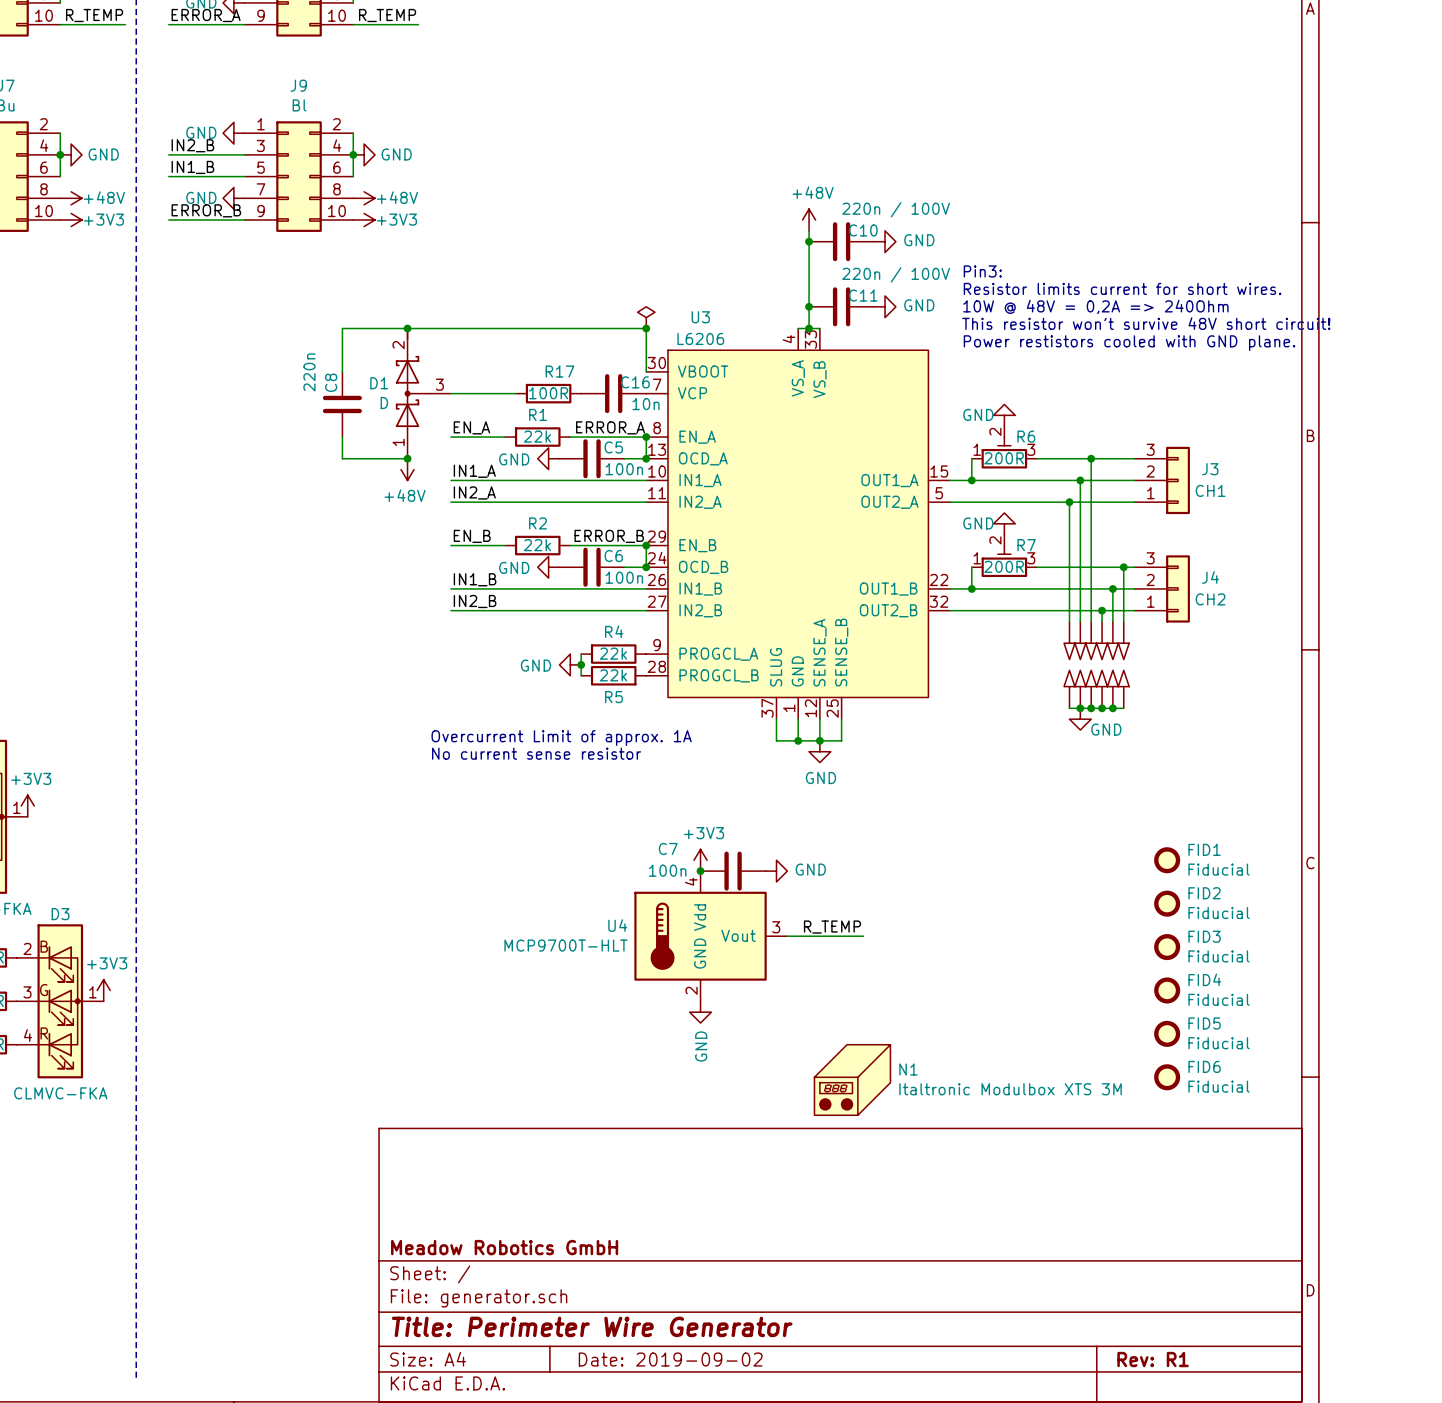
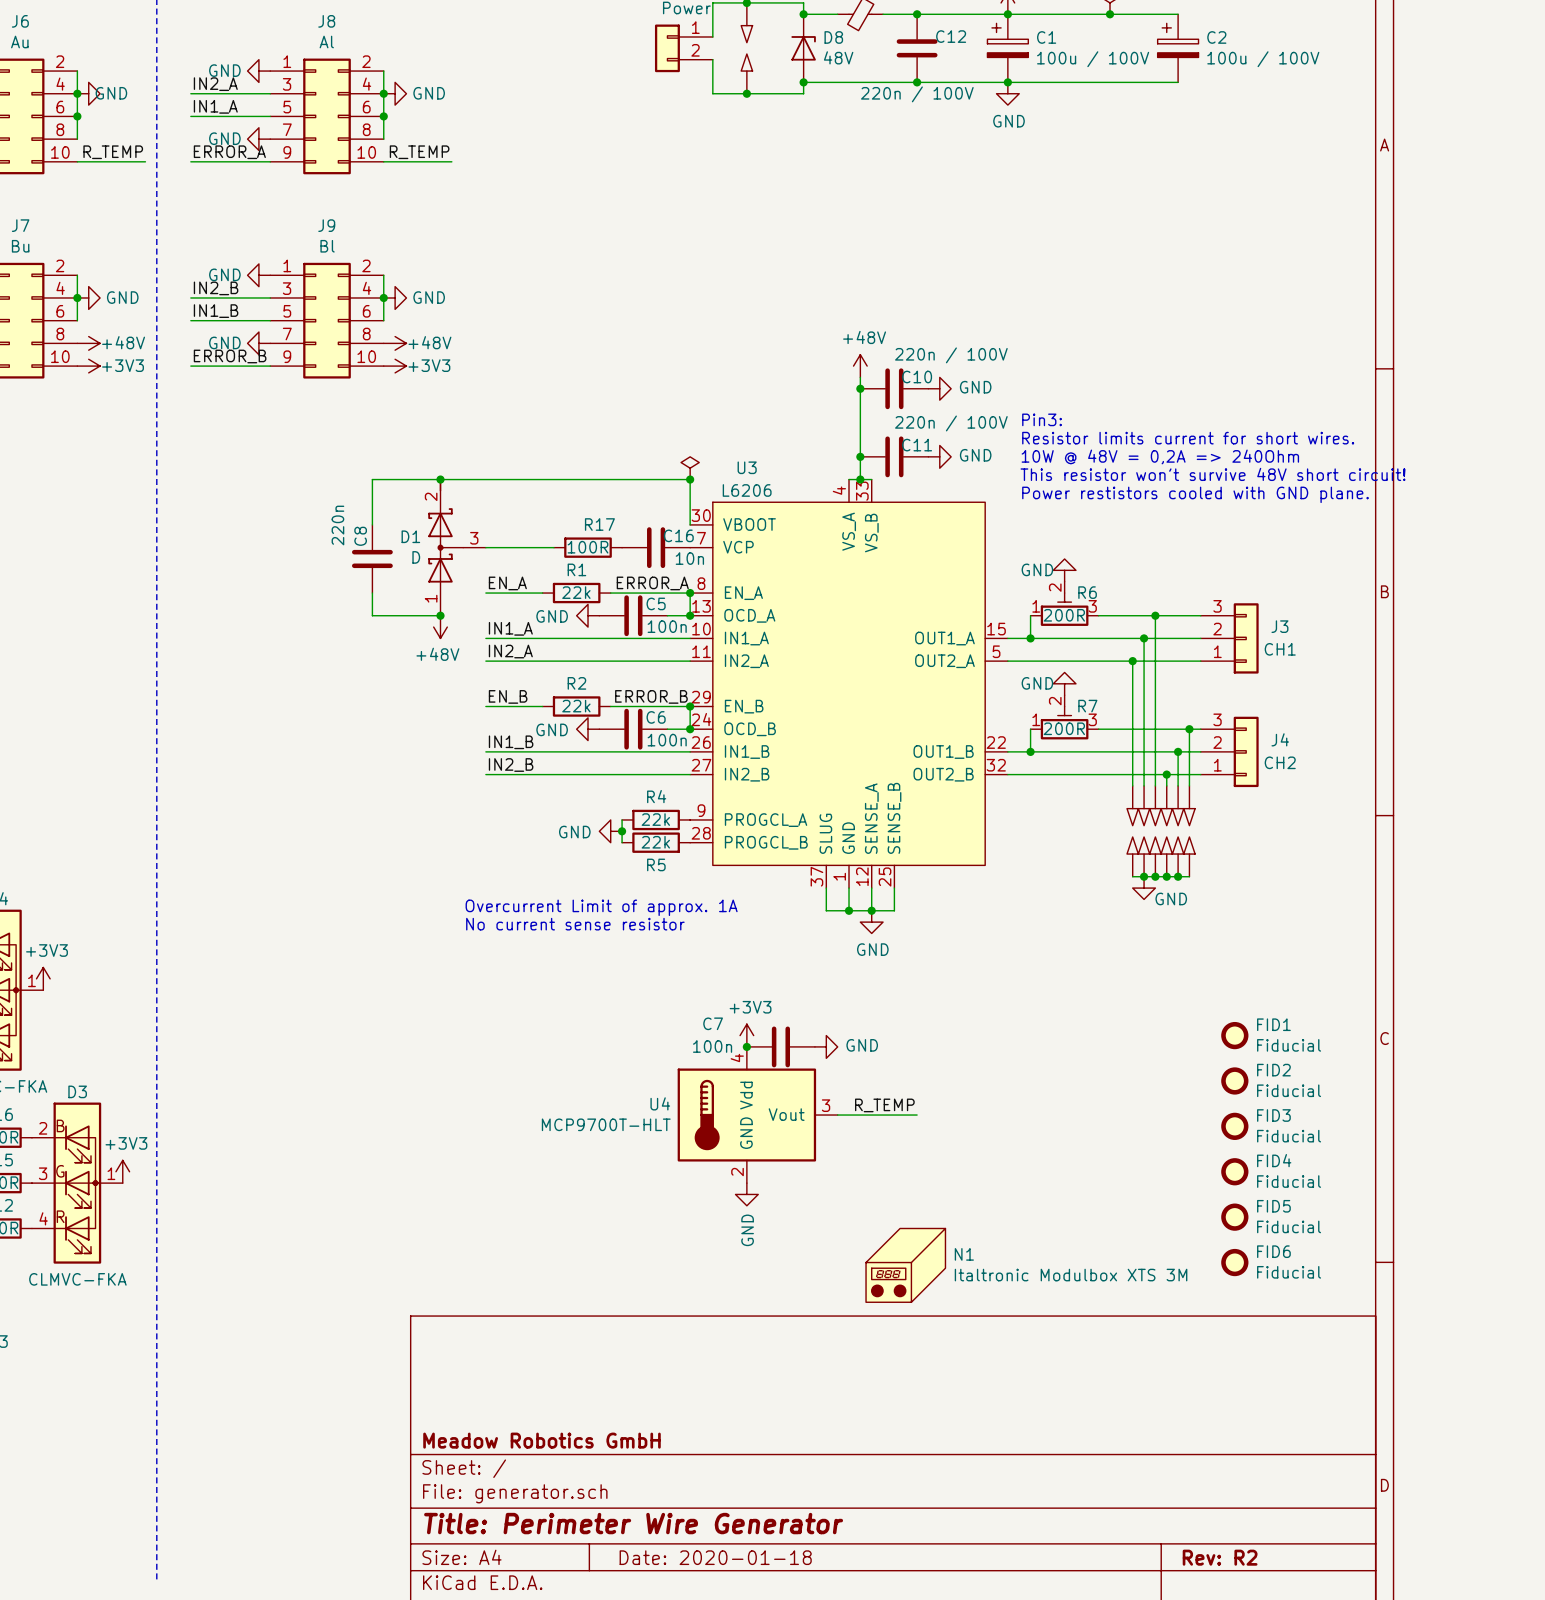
title block: Date: 2019-09-02 (670, 1359) -> Date: 2020-01-18 (715, 1557)
title block: Rev: R1 (1153, 1359) -> Rev: R2 (1220, 1557)

